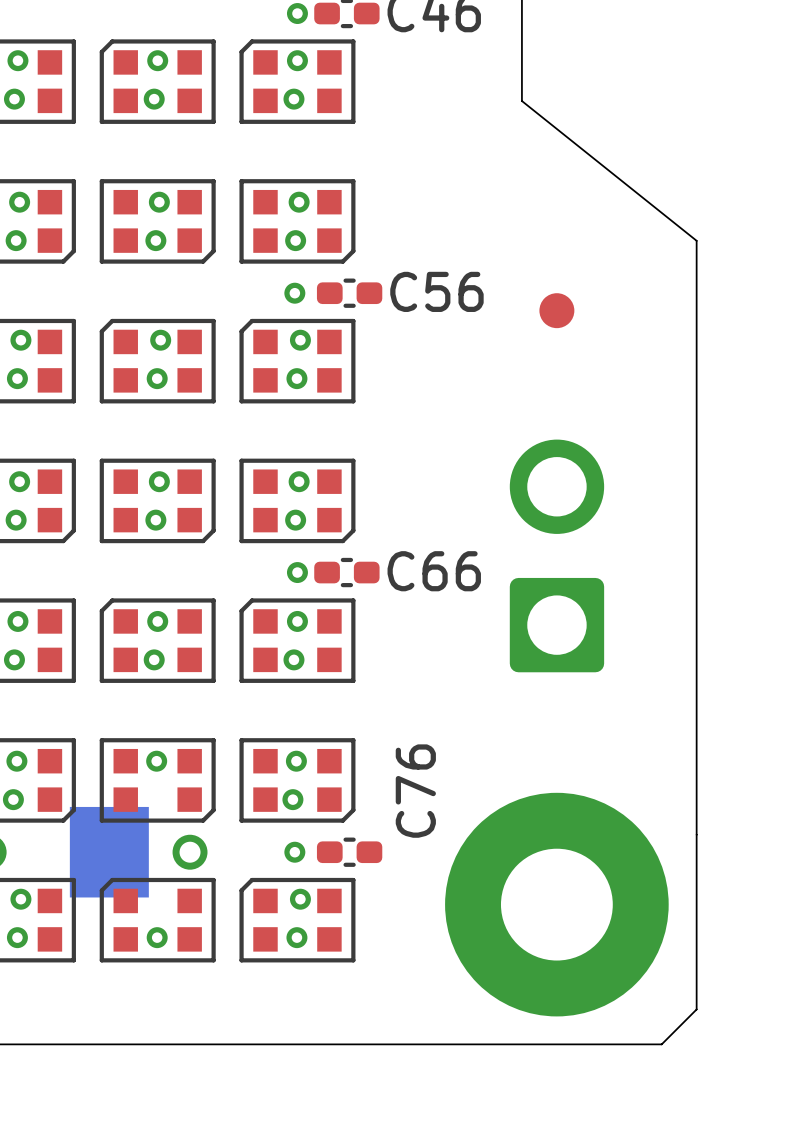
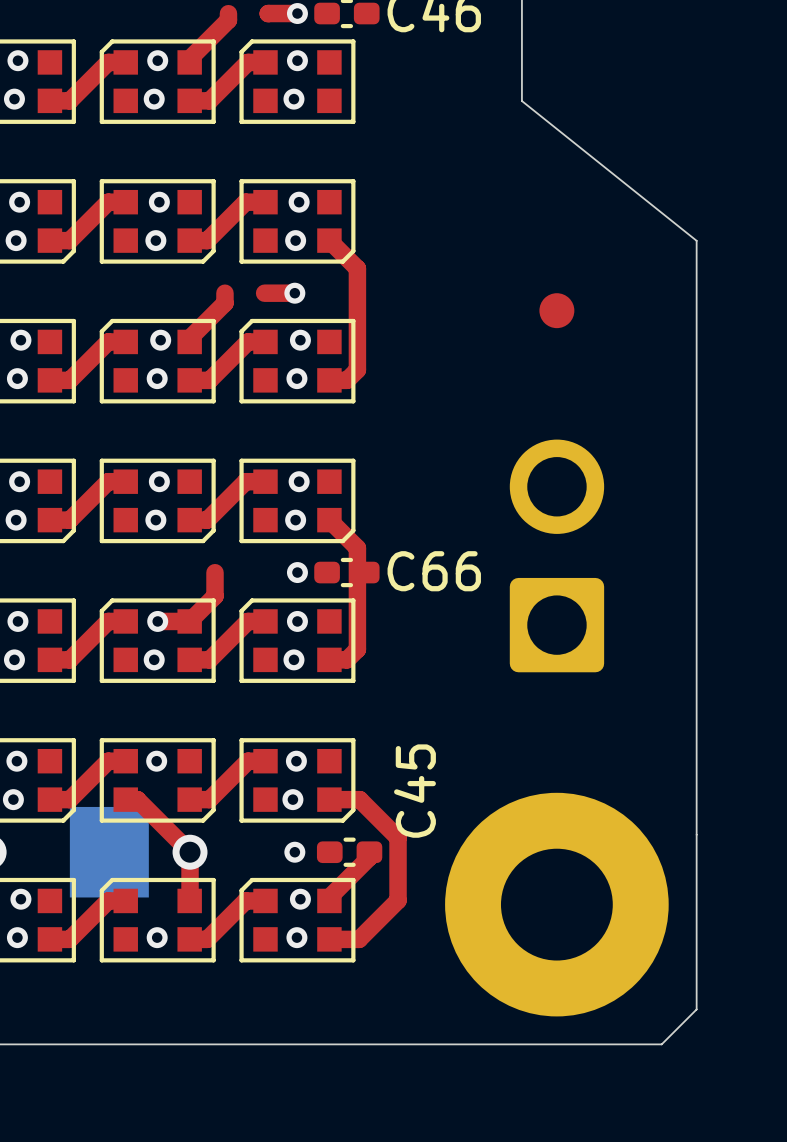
top track: none -> (228, 13) (228, 20) (187, 60) (189, 62)
top track: none -> (268, 13) (297, 13)
top track: none -> (125, 62) (108, 62) (69, 100) (49, 100)
top track: none -> (265, 62) (247, 62) (209, 100) (189, 100)
top track: none -> (125, 202) (108, 202) (69, 240) (49, 240)
top track: none -> (265, 202) (245, 202) (207, 240) (189, 240)
top track: none -> (329, 240) (357, 268) (357, 369) (346, 380) (329, 380)
top track: none -> (224, 293) (224, 303) (187, 340) (189, 341)
top track: none -> (264, 293) (294, 293)
C56: (349, 293) -> none
top track: none -> (125, 341) (108, 341) (69, 380) (49, 380)
top track: none -> (265, 341) (247, 341) (209, 380) (189, 380)
top track: none -> (125, 481) (108, 481) (69, 520) (49, 520)
top track: none -> (265, 481) (245, 481) (207, 520) (189, 520)
top track: none -> (329, 520) (357, 548) (357, 649) (346, 659) (329, 659)
top track: none -> (215, 572) (215, 596) (189, 621) (157, 621)
top track: none -> (125, 621) (108, 621) (69, 659) (49, 659)
top track: none -> (265, 621) (247, 621) (209, 659) (189, 659)
top track: none -> (125, 761) (108, 761) (69, 799) (49, 799)
top track: none -> (265, 761) (247, 761) (209, 799) (189, 799)
C76 name: C76 (415, 791) -> C45 (414, 791)
top track: none -> (125, 799) (137, 799) (190, 852) (190, 900)
top track: none -> (329, 799) (359, 799) (398, 837) (398, 900) (359, 939) (329, 939)
top track: none -> (369, 852) (369, 857) (327, 899) (329, 900)
top track: none -> (125, 900) (108, 900) (69, 939) (49, 939)
top track: none -> (265, 900) (245, 900) (207, 939) (189, 939)

